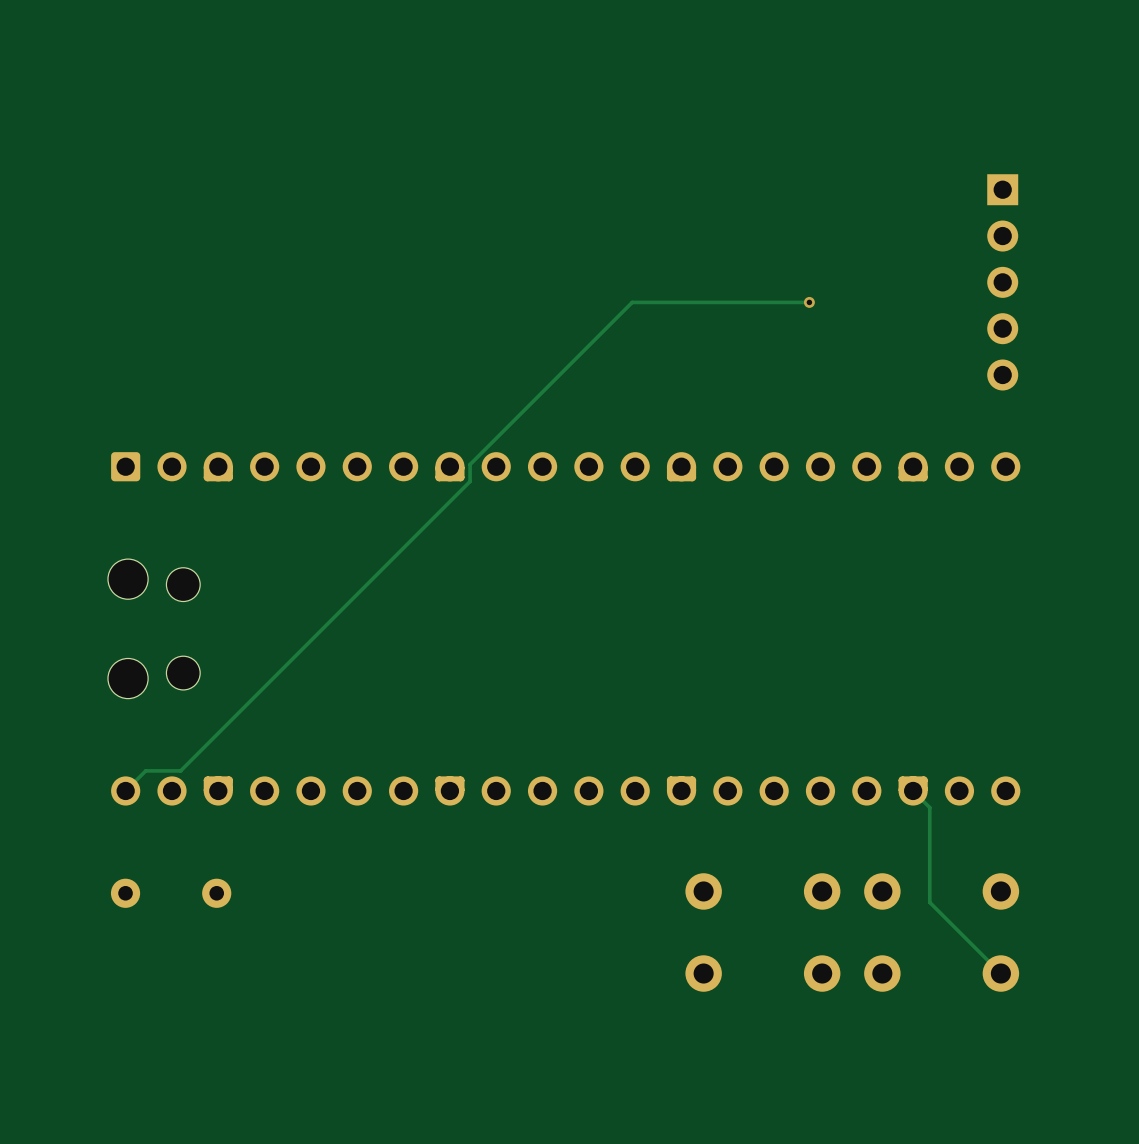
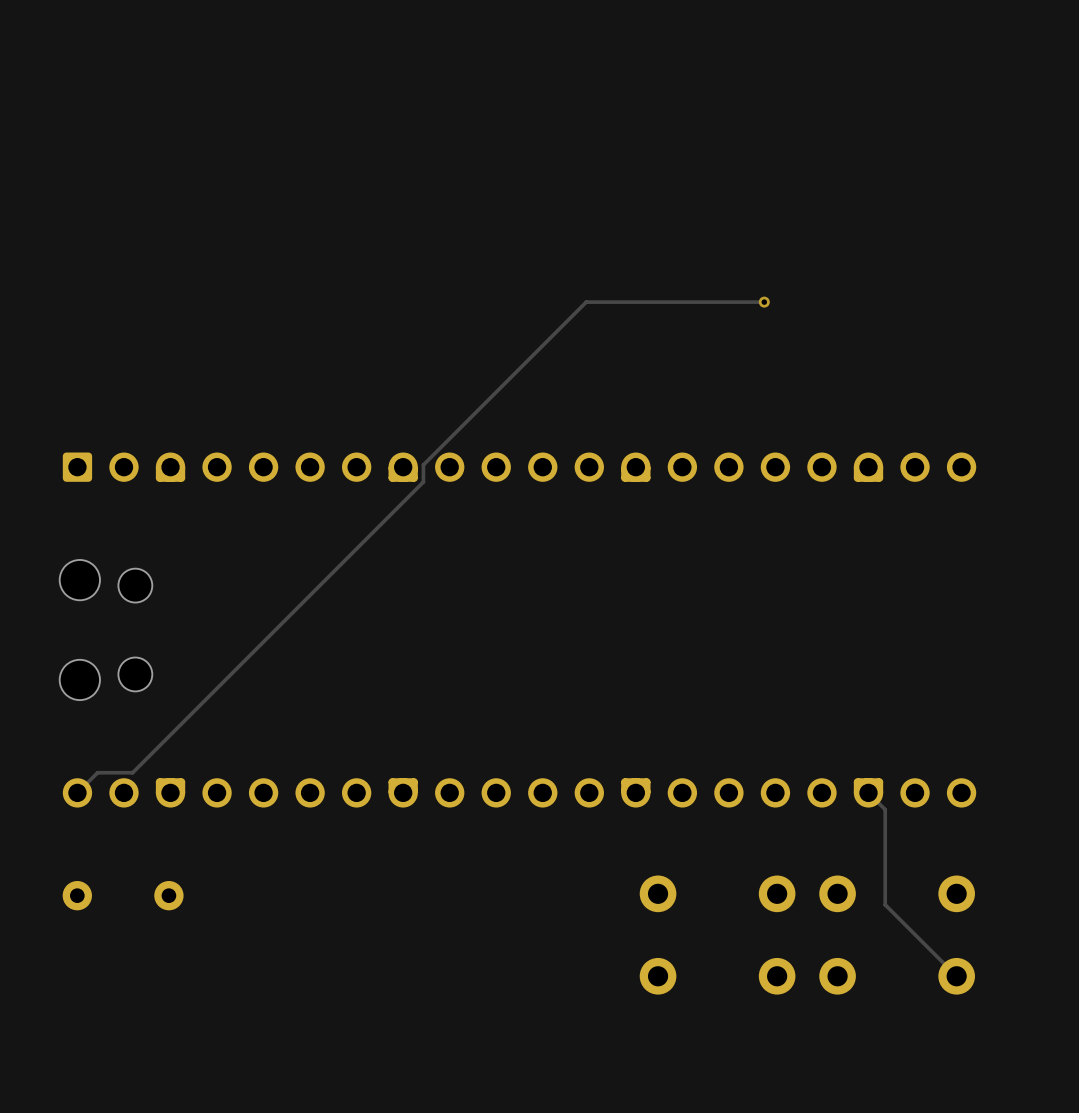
part: (1002, 282) -> none

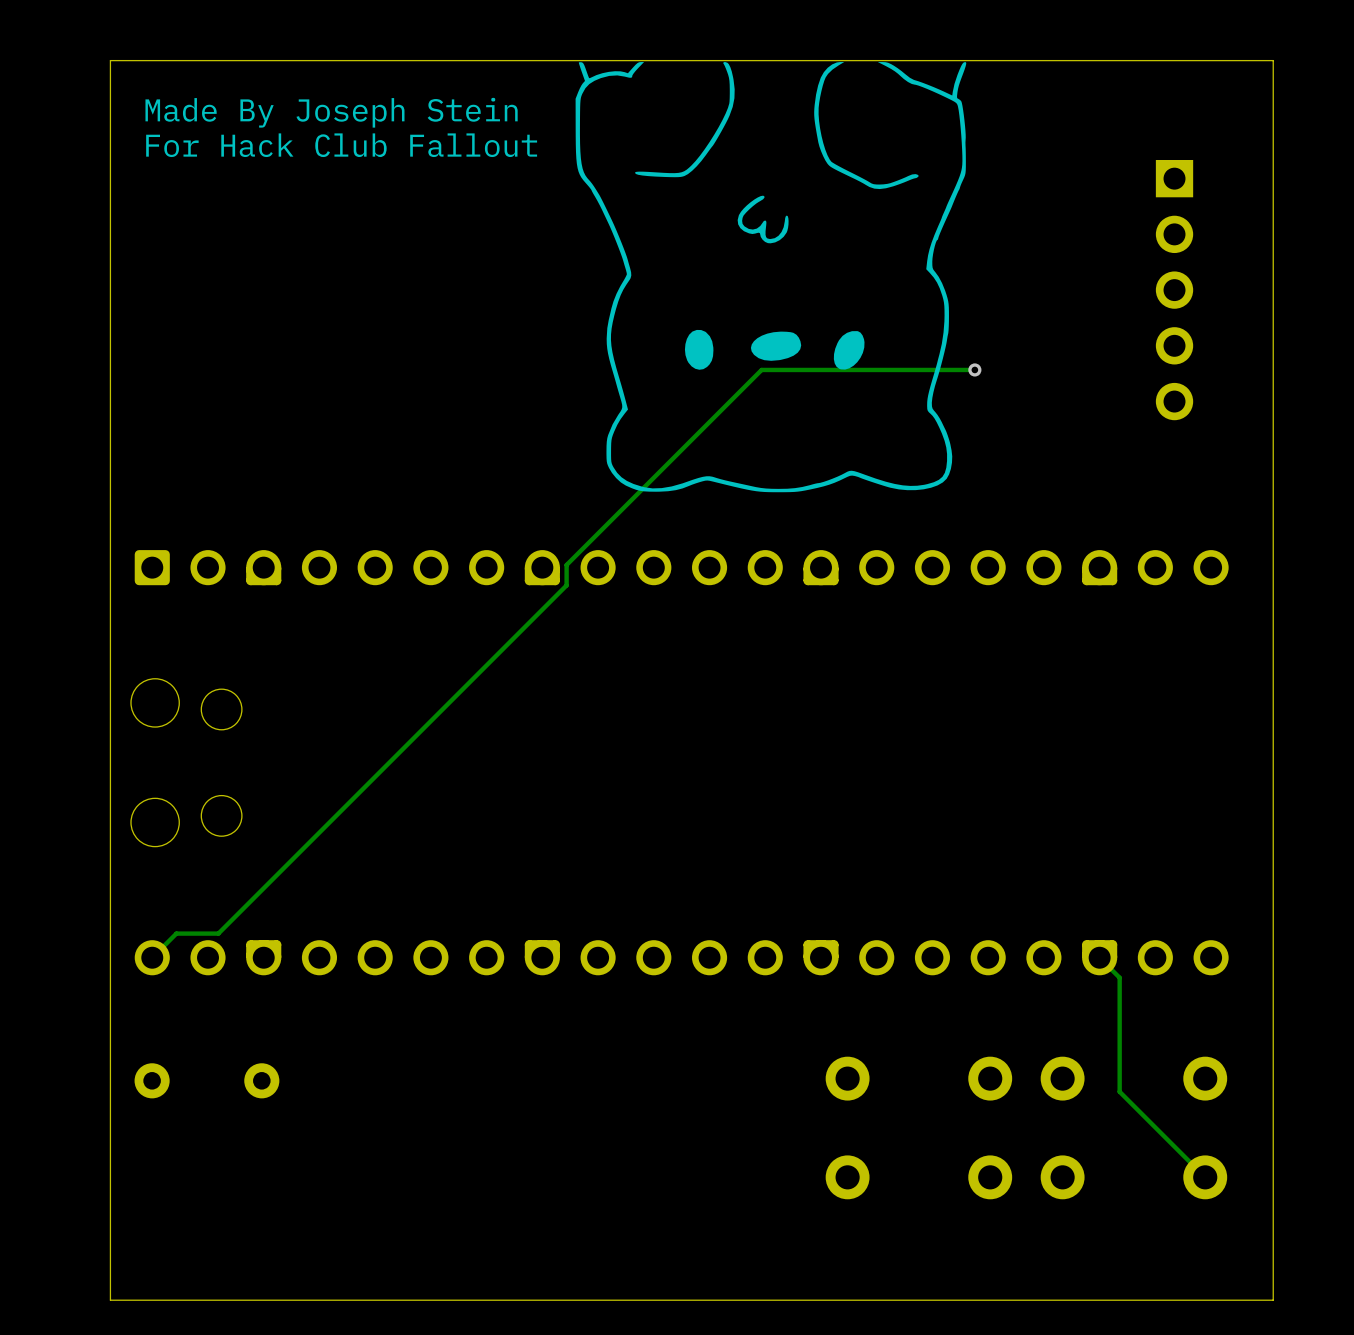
board edge: none -> (1273, 60) (110, 60) (110, 1300) (1273, 1300) (1273, 60)
drawing: none -> [575, 62, 967, 493]
text: none -> Made By Joseph Stein (331, 112)
text: none -> For Hack Club Fallout (341, 145)
part: none -> (1174, 290)

